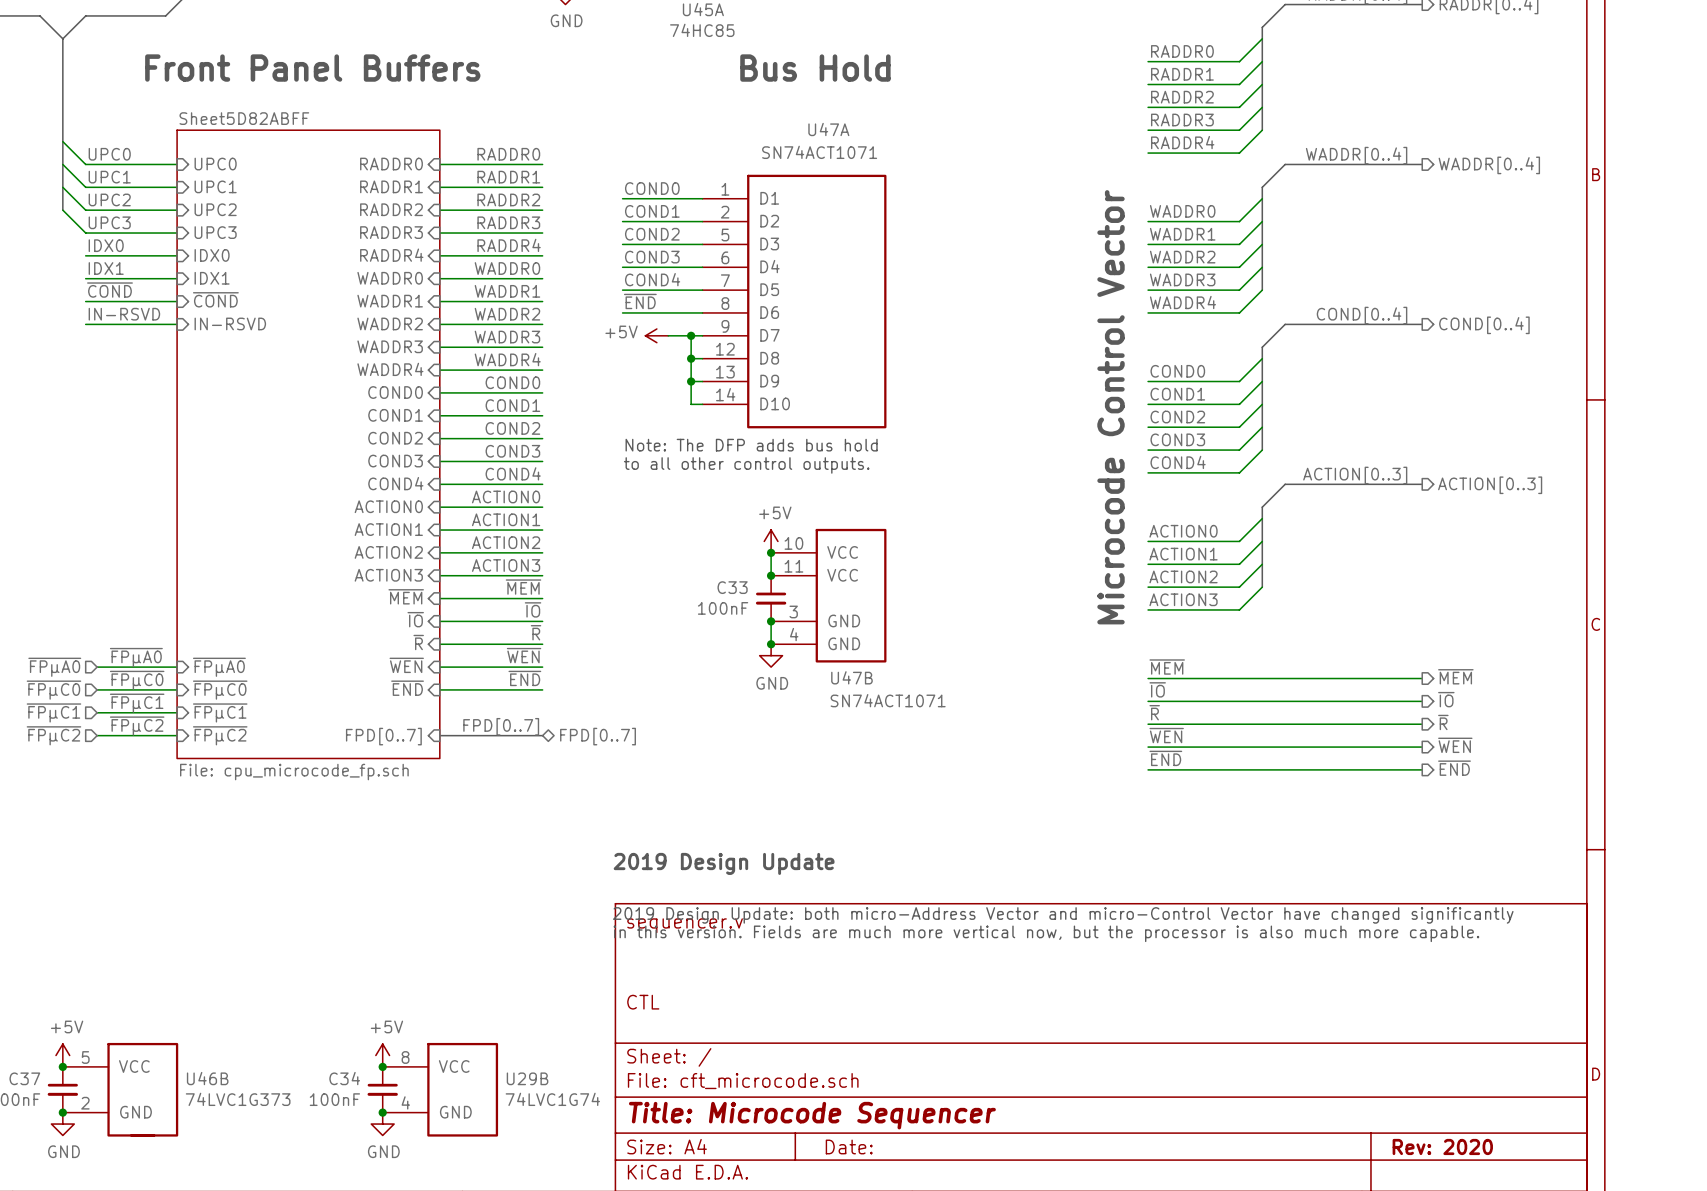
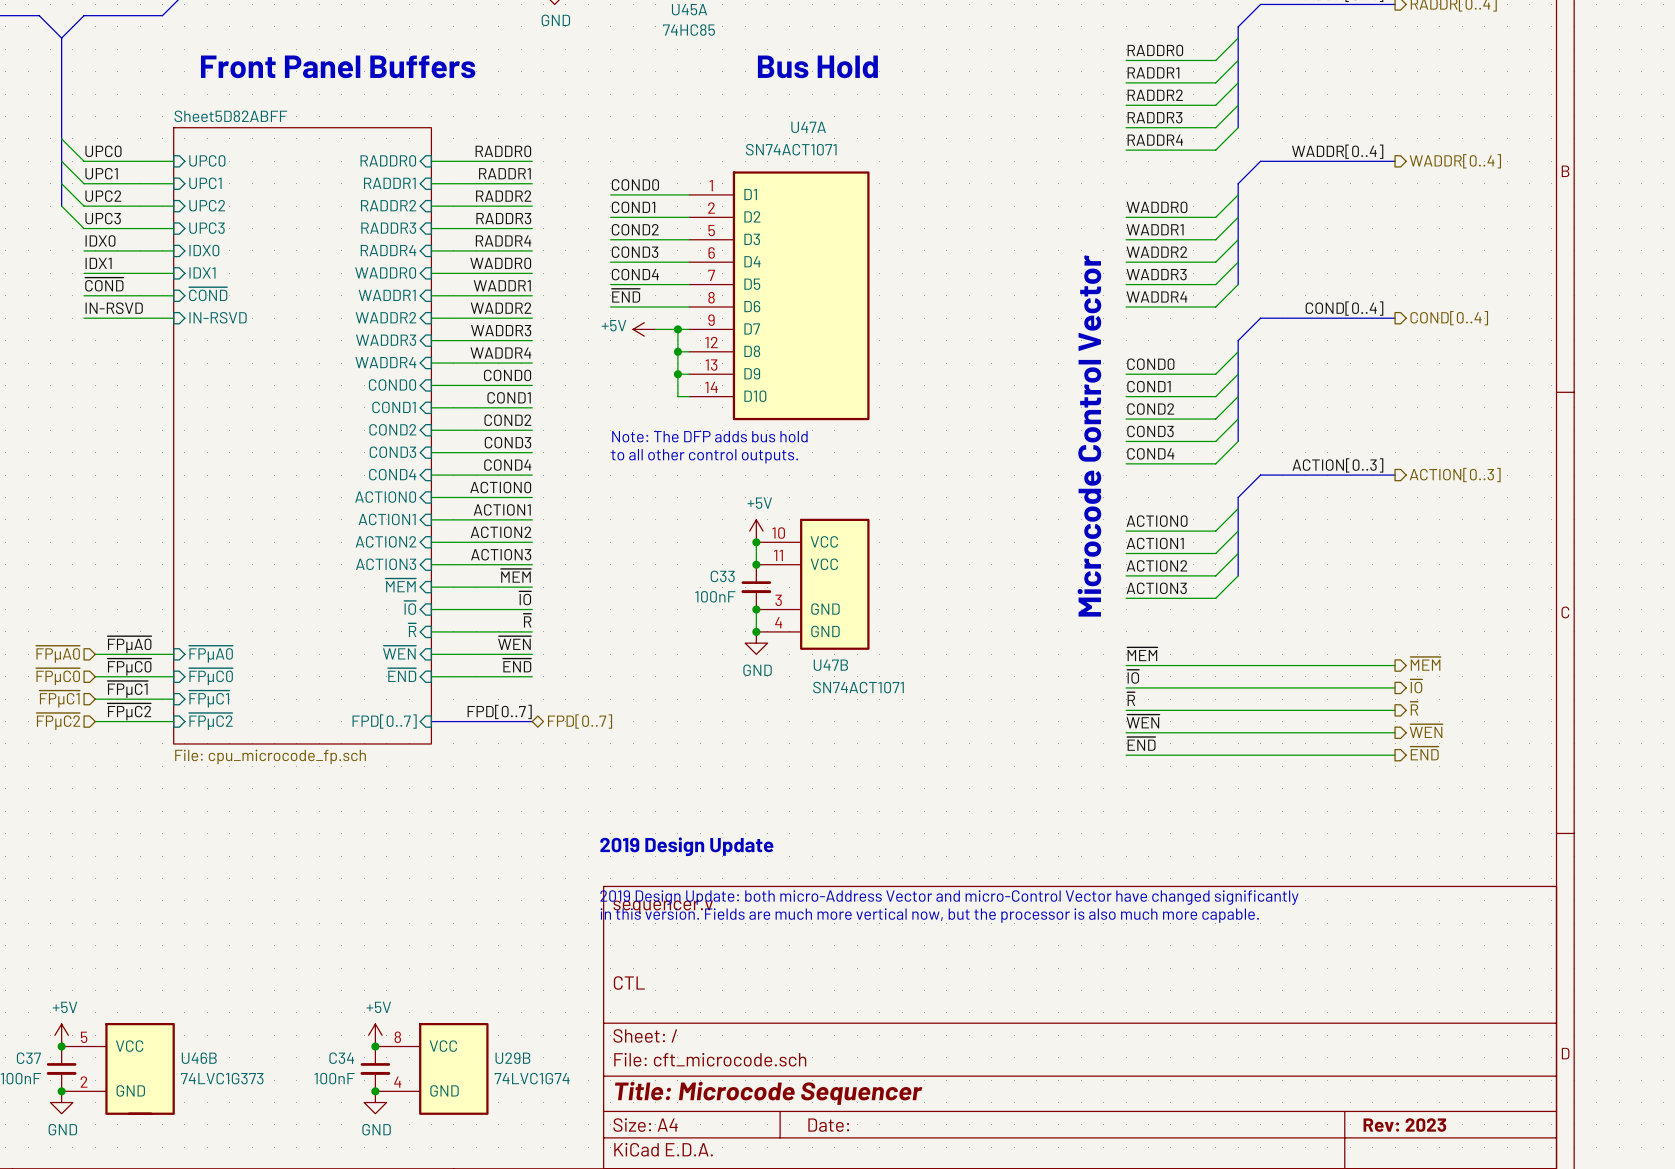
title block: Rev: 2020 (1442, 1146) -> Rev: 2023 (1404, 1125)

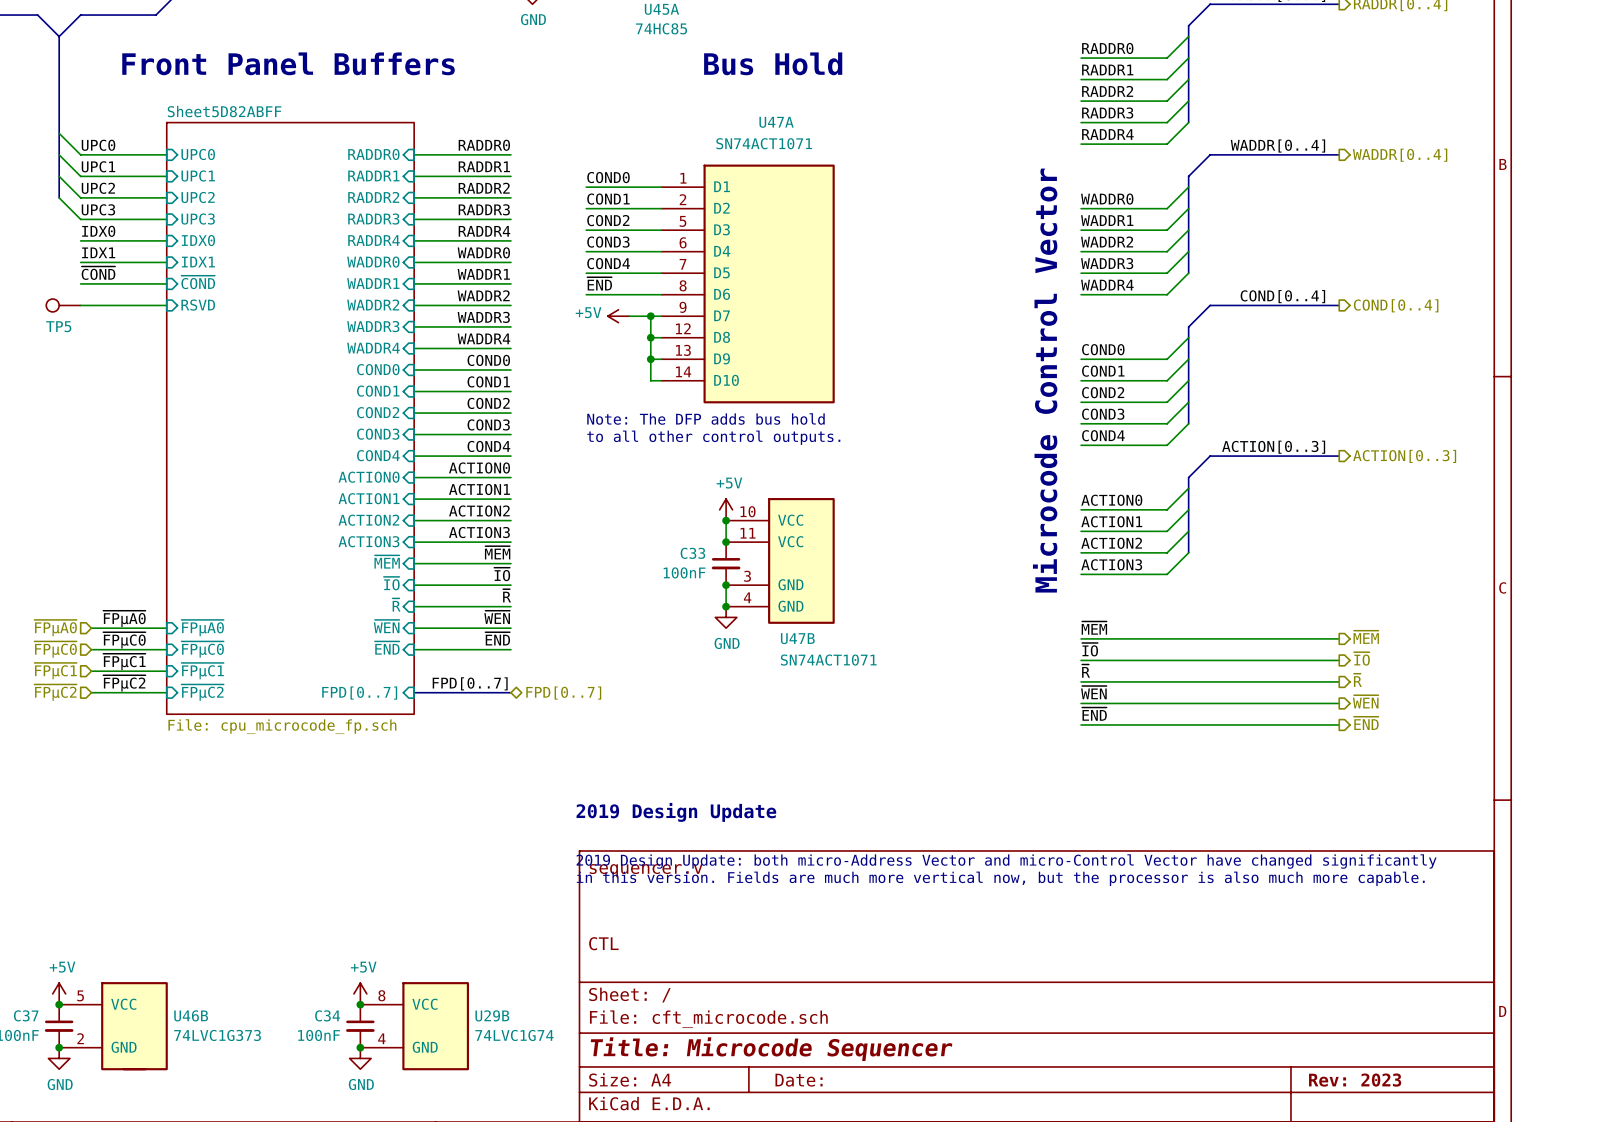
label: IN-RSVD (114, 308) -> none
sheet pin: IN-RSVD (218, 317) -> RSVD (198, 305)
TP5: none -> (63, 305)

